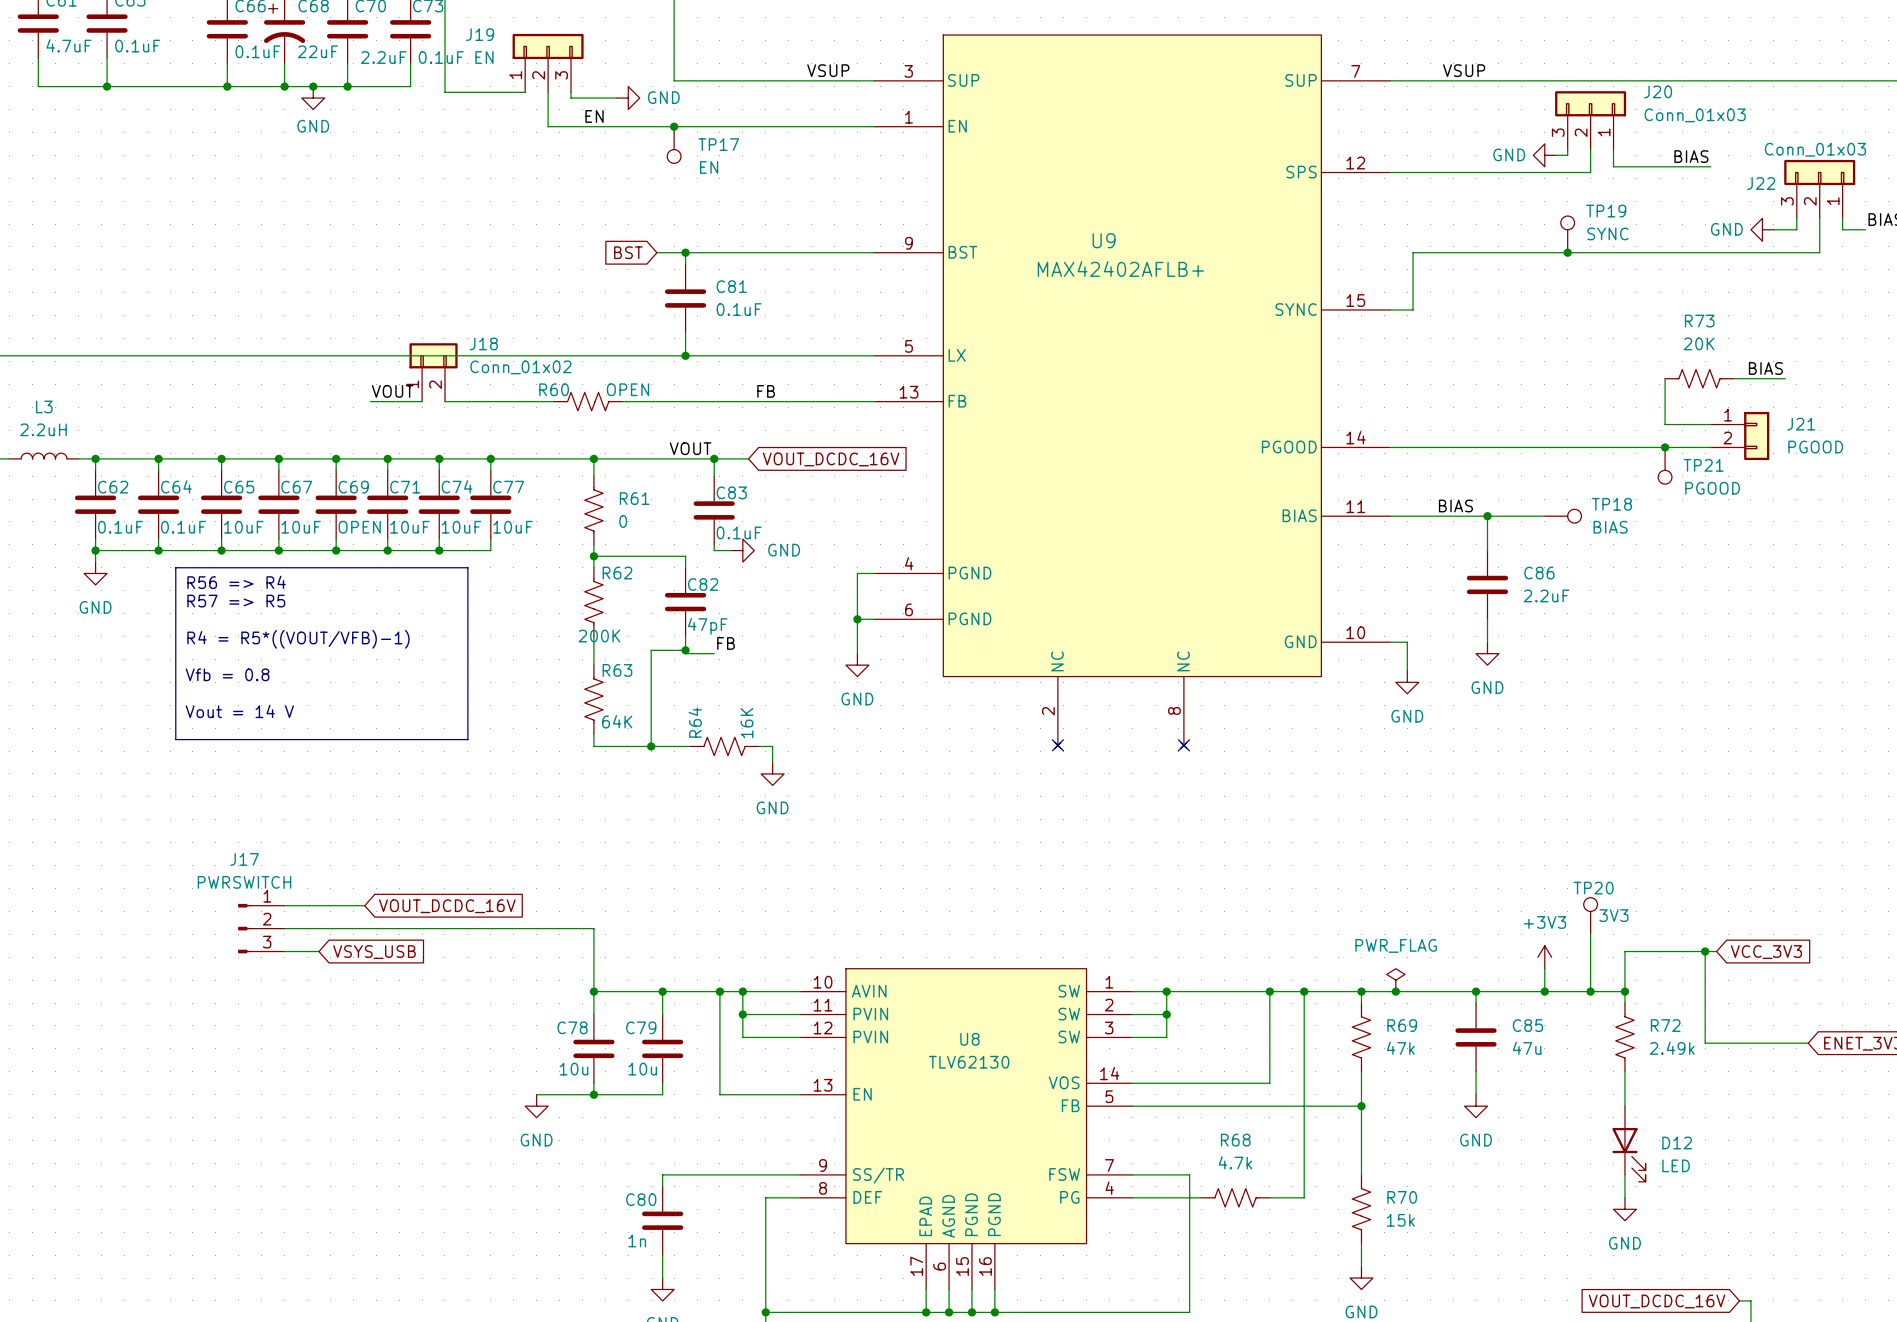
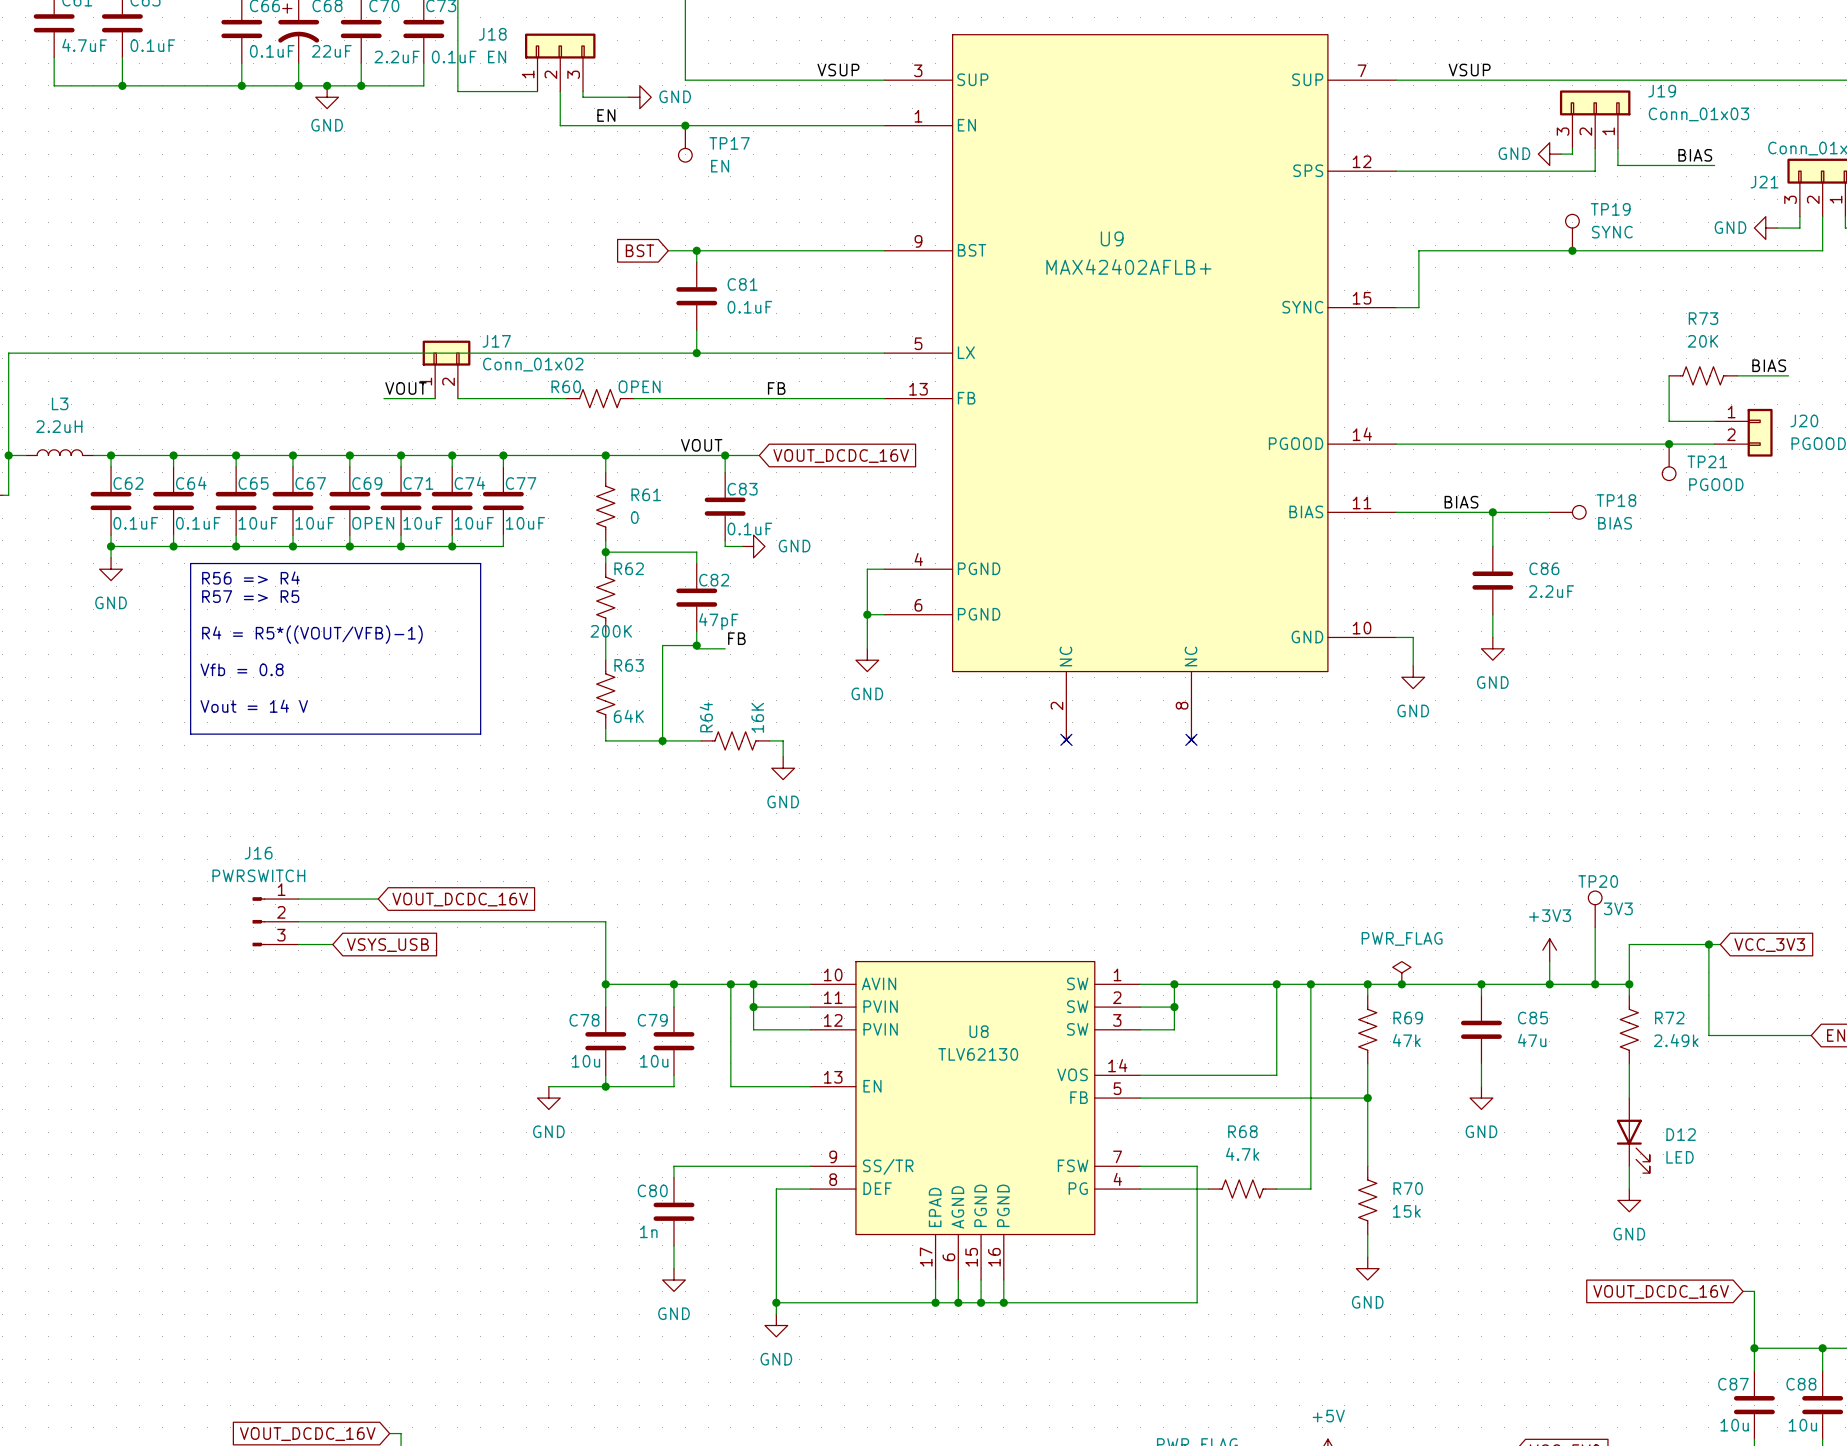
J19 name: J19 (480, 34) -> J18 (492, 34)
J20 name: J20 (1658, 91) -> J19 (1662, 91)
J22 name: J22 (1761, 183) -> J21 (1764, 182)
J18 name: J18 (483, 343) -> J17 (496, 341)
J21 name: J21 (1801, 424) -> J20 (1804, 420)
J17 name: J17 (244, 859) -> J16 (258, 853)

